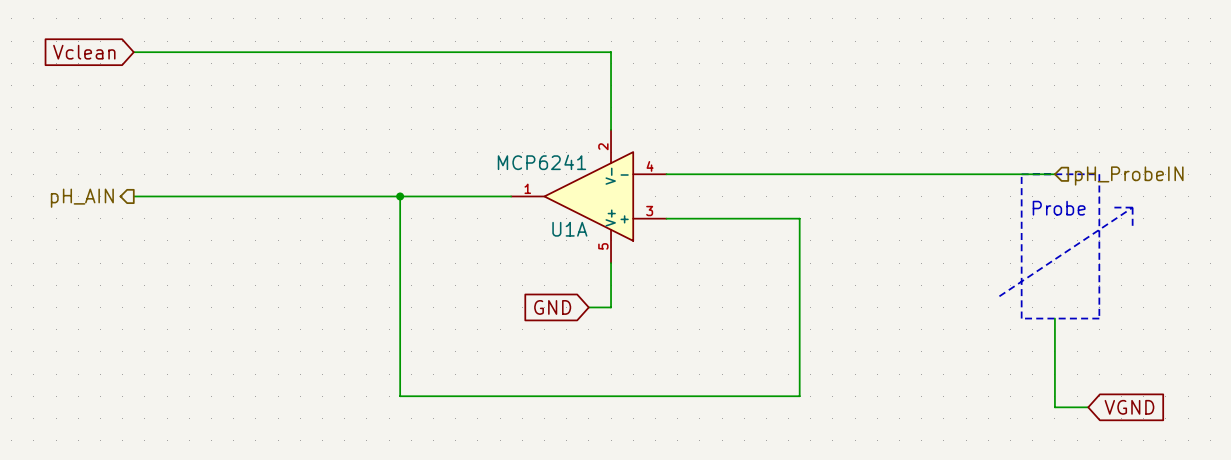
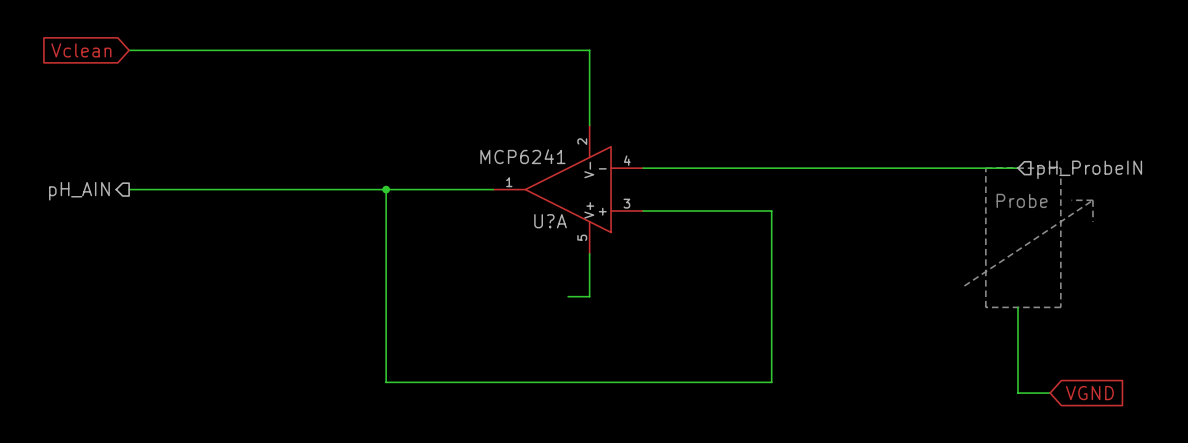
U1A name: U1A (569, 229) -> U?A (550, 221)
global label: GND (552, 307) -> none

